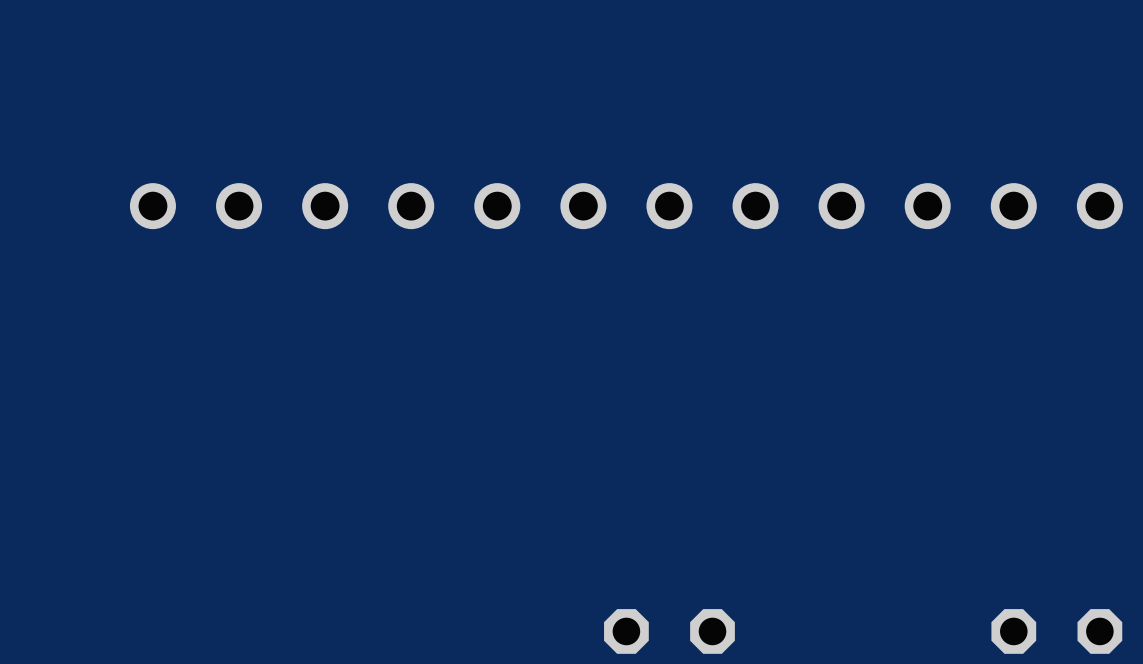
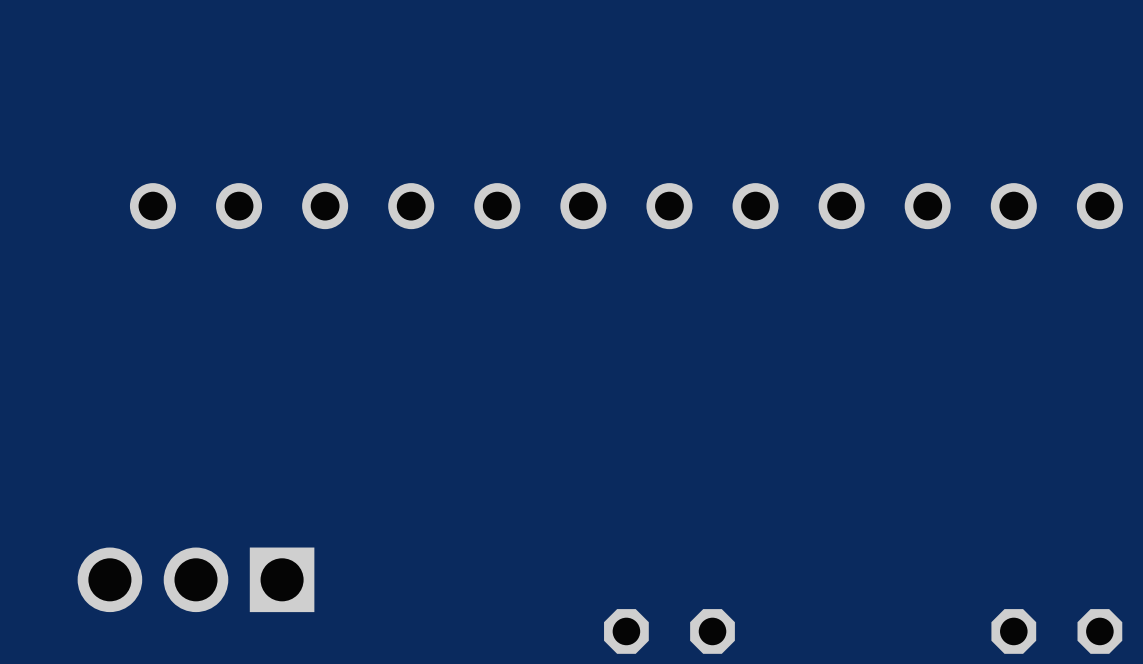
part: none -> (196, 579)

